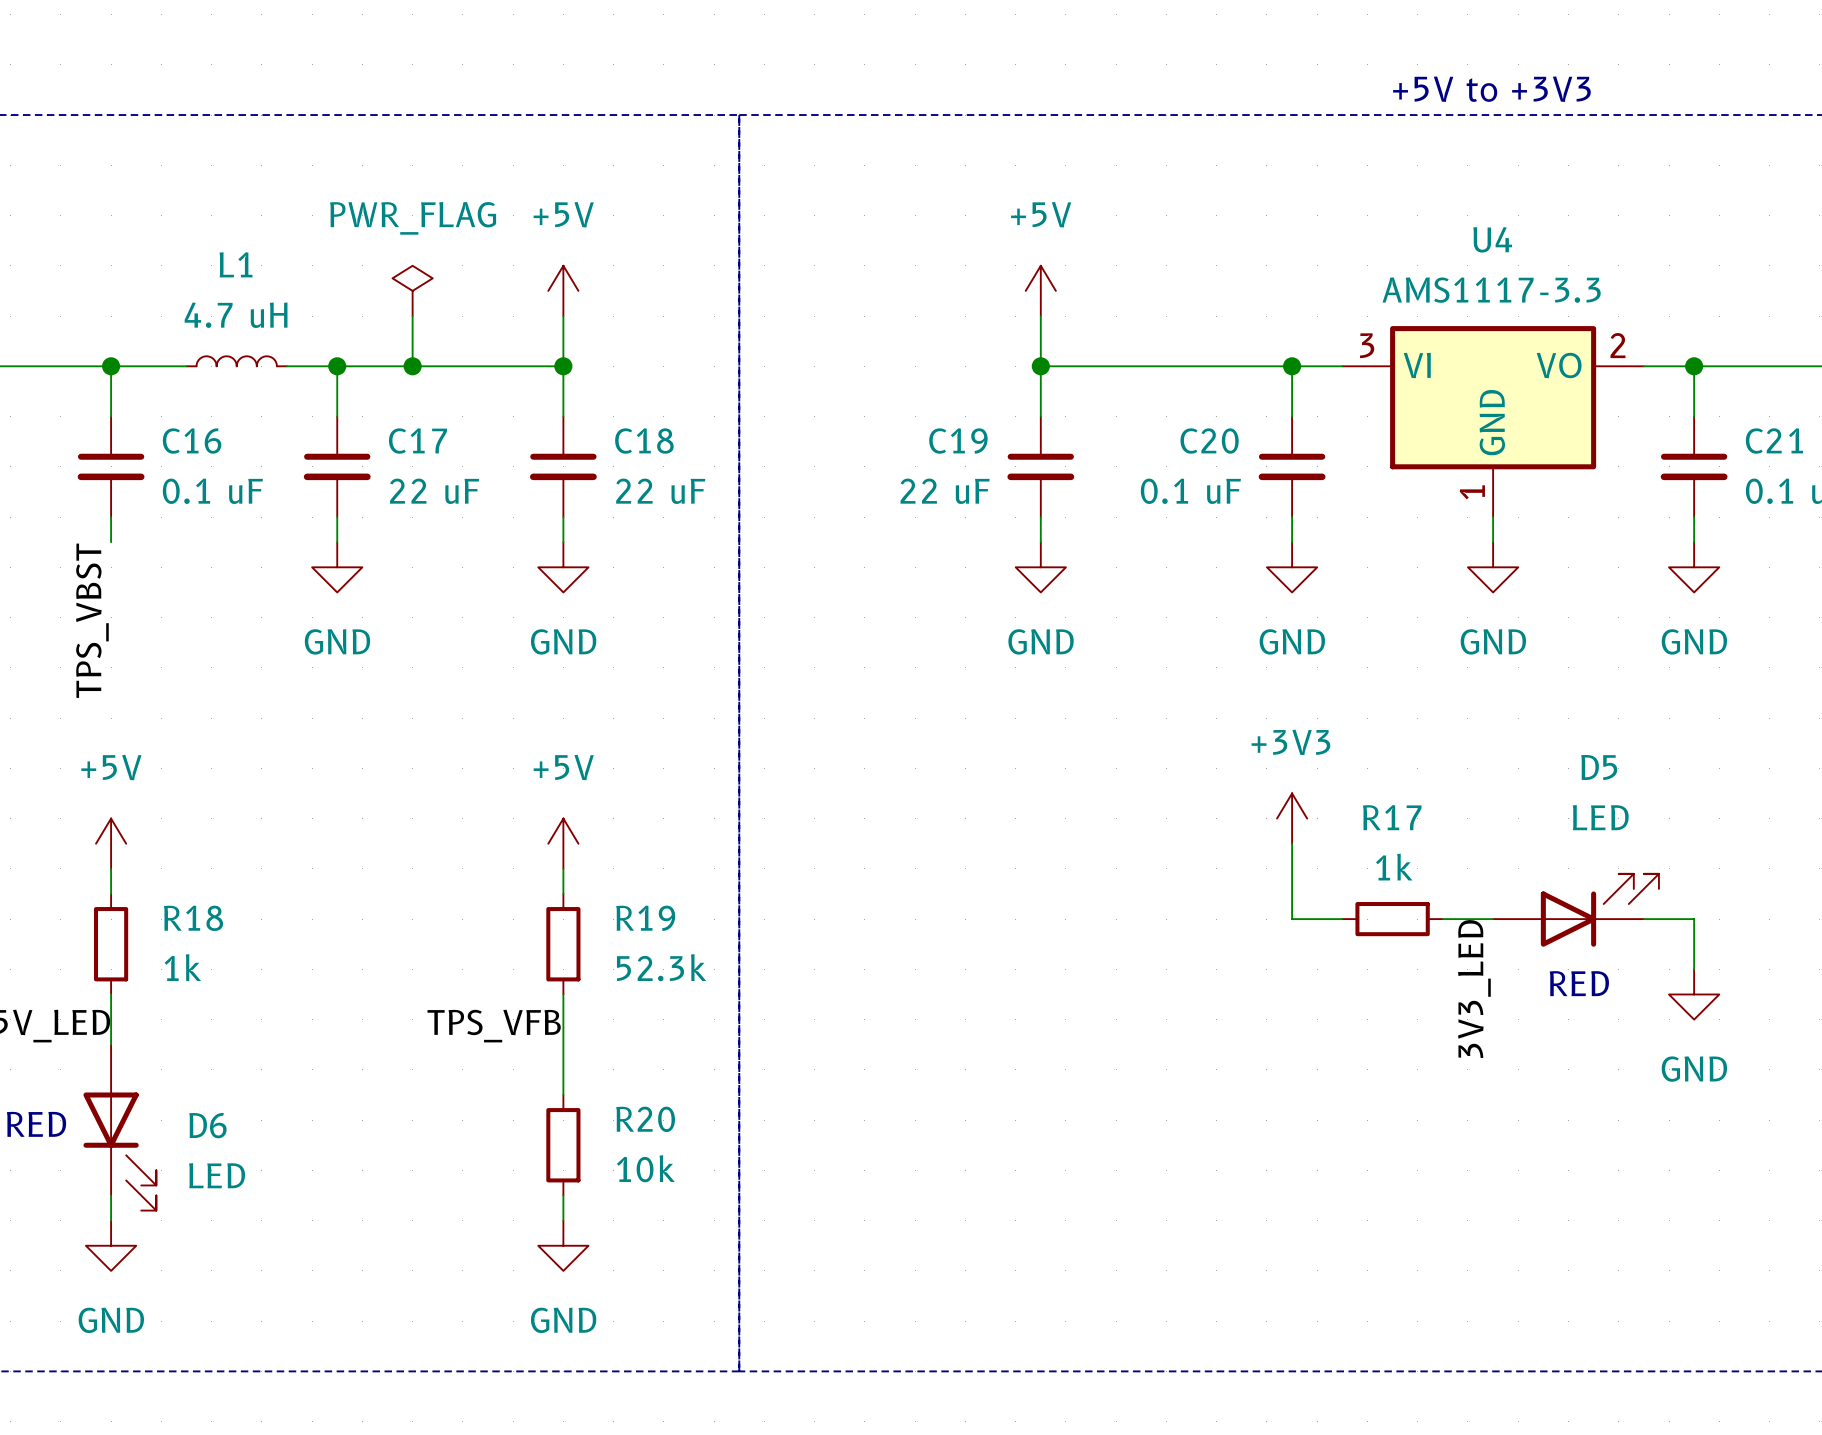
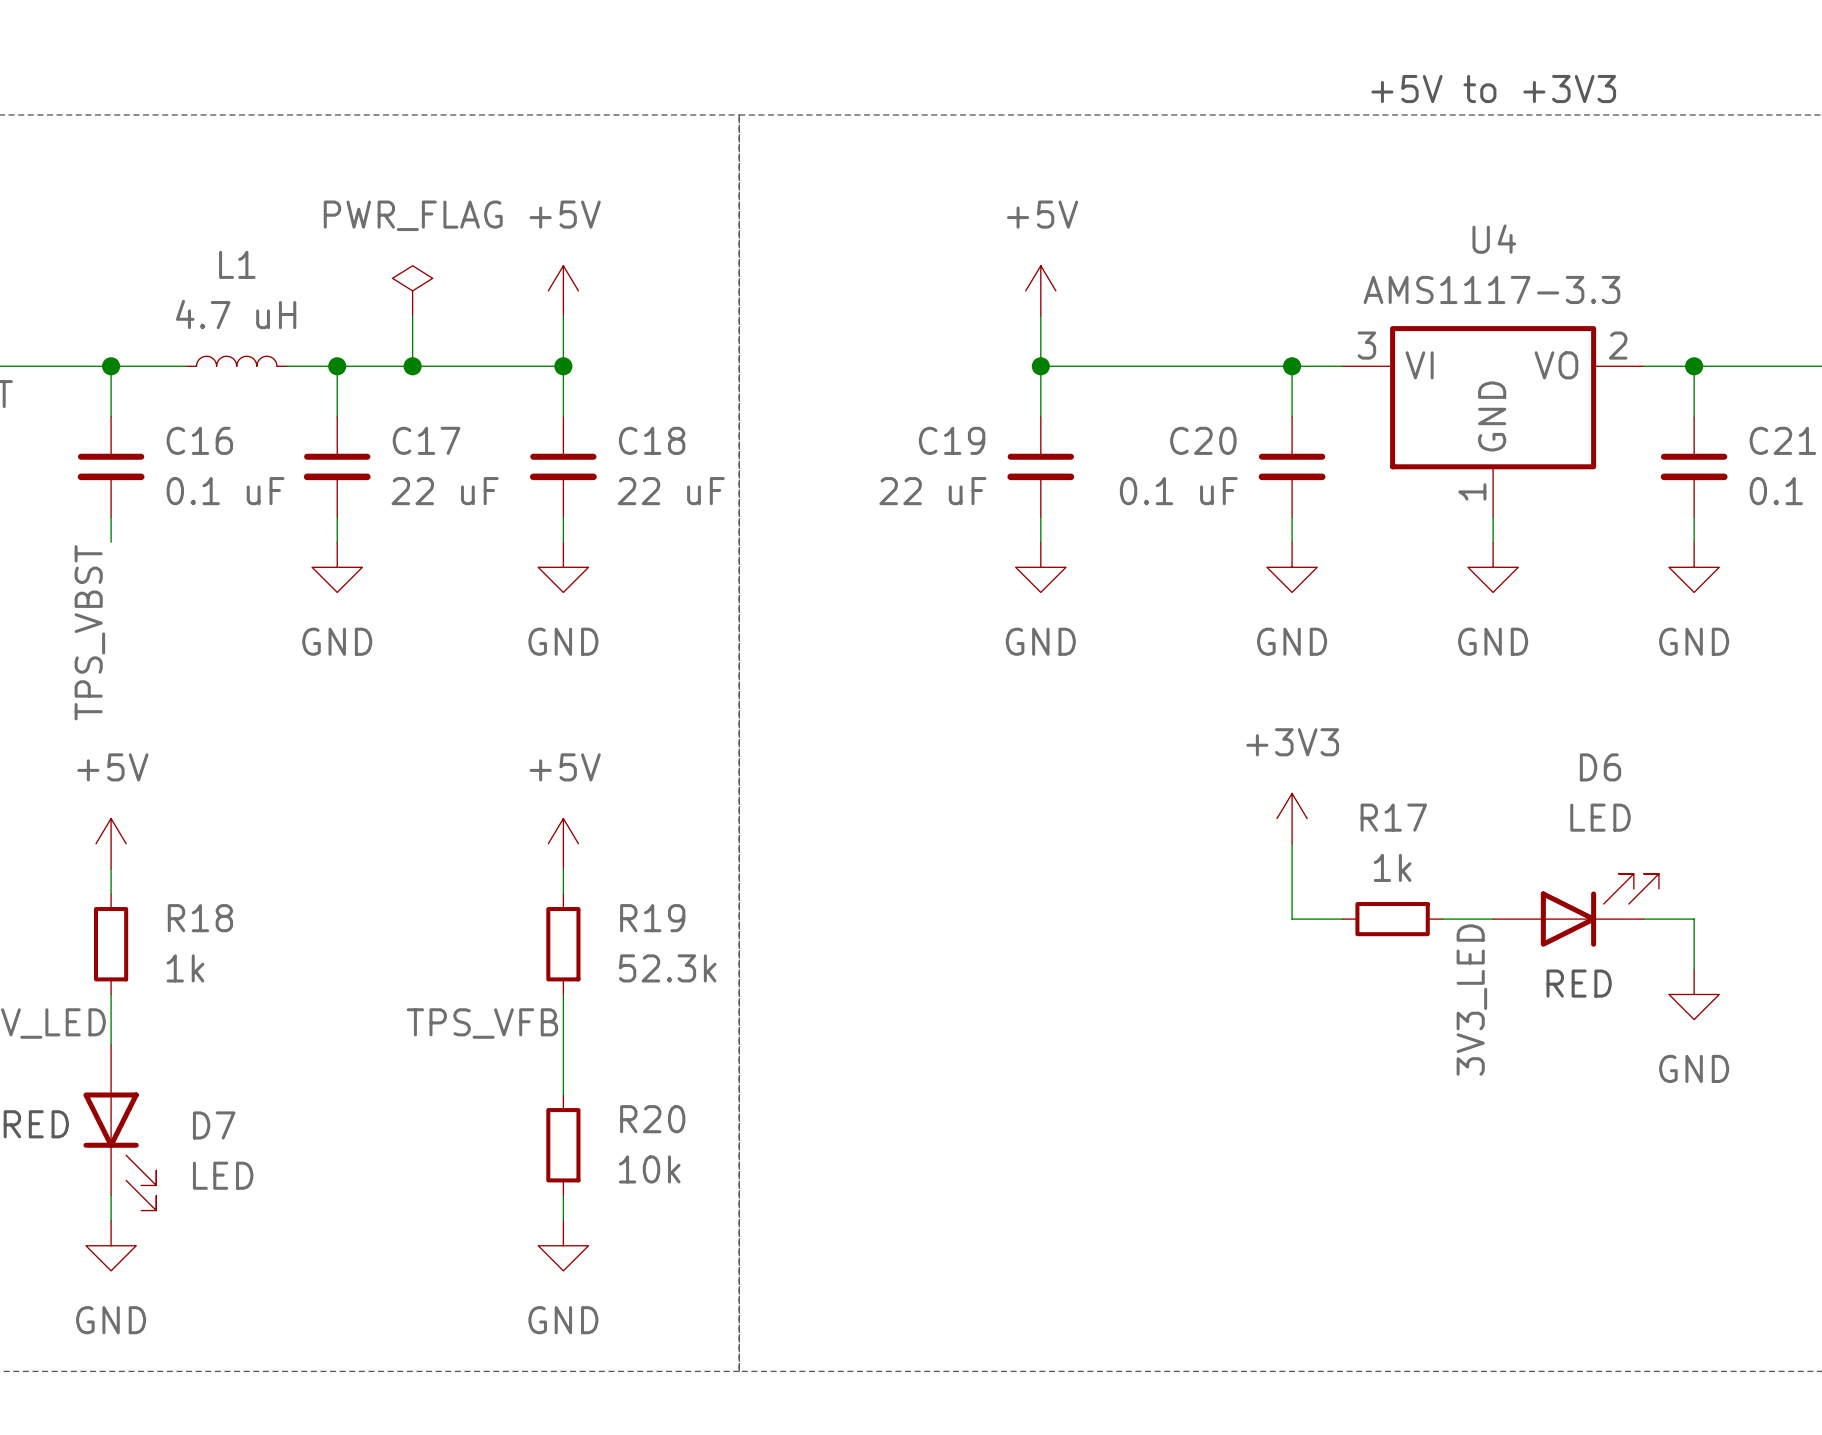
D5 name: D5 (1599, 767) -> D6 (1600, 767)
D6 name: D6 (207, 1125) -> D7 (214, 1125)

